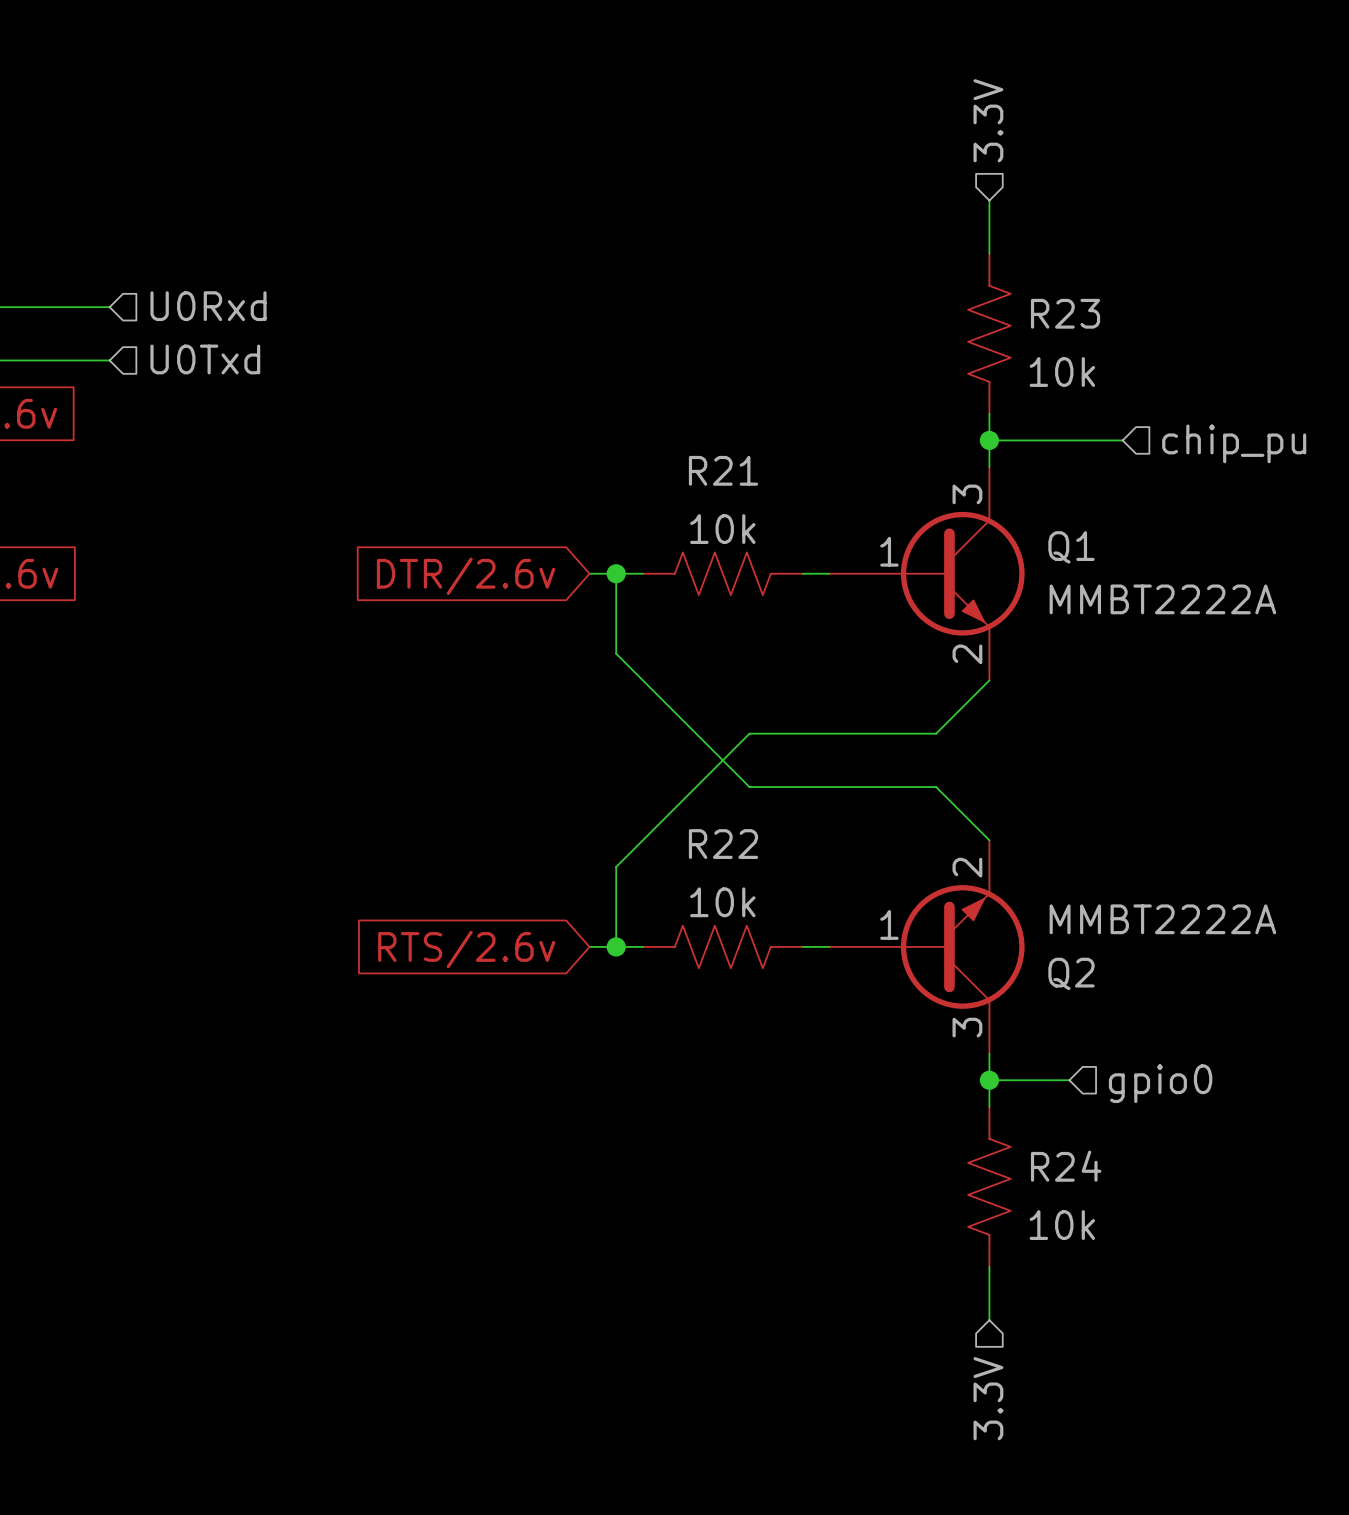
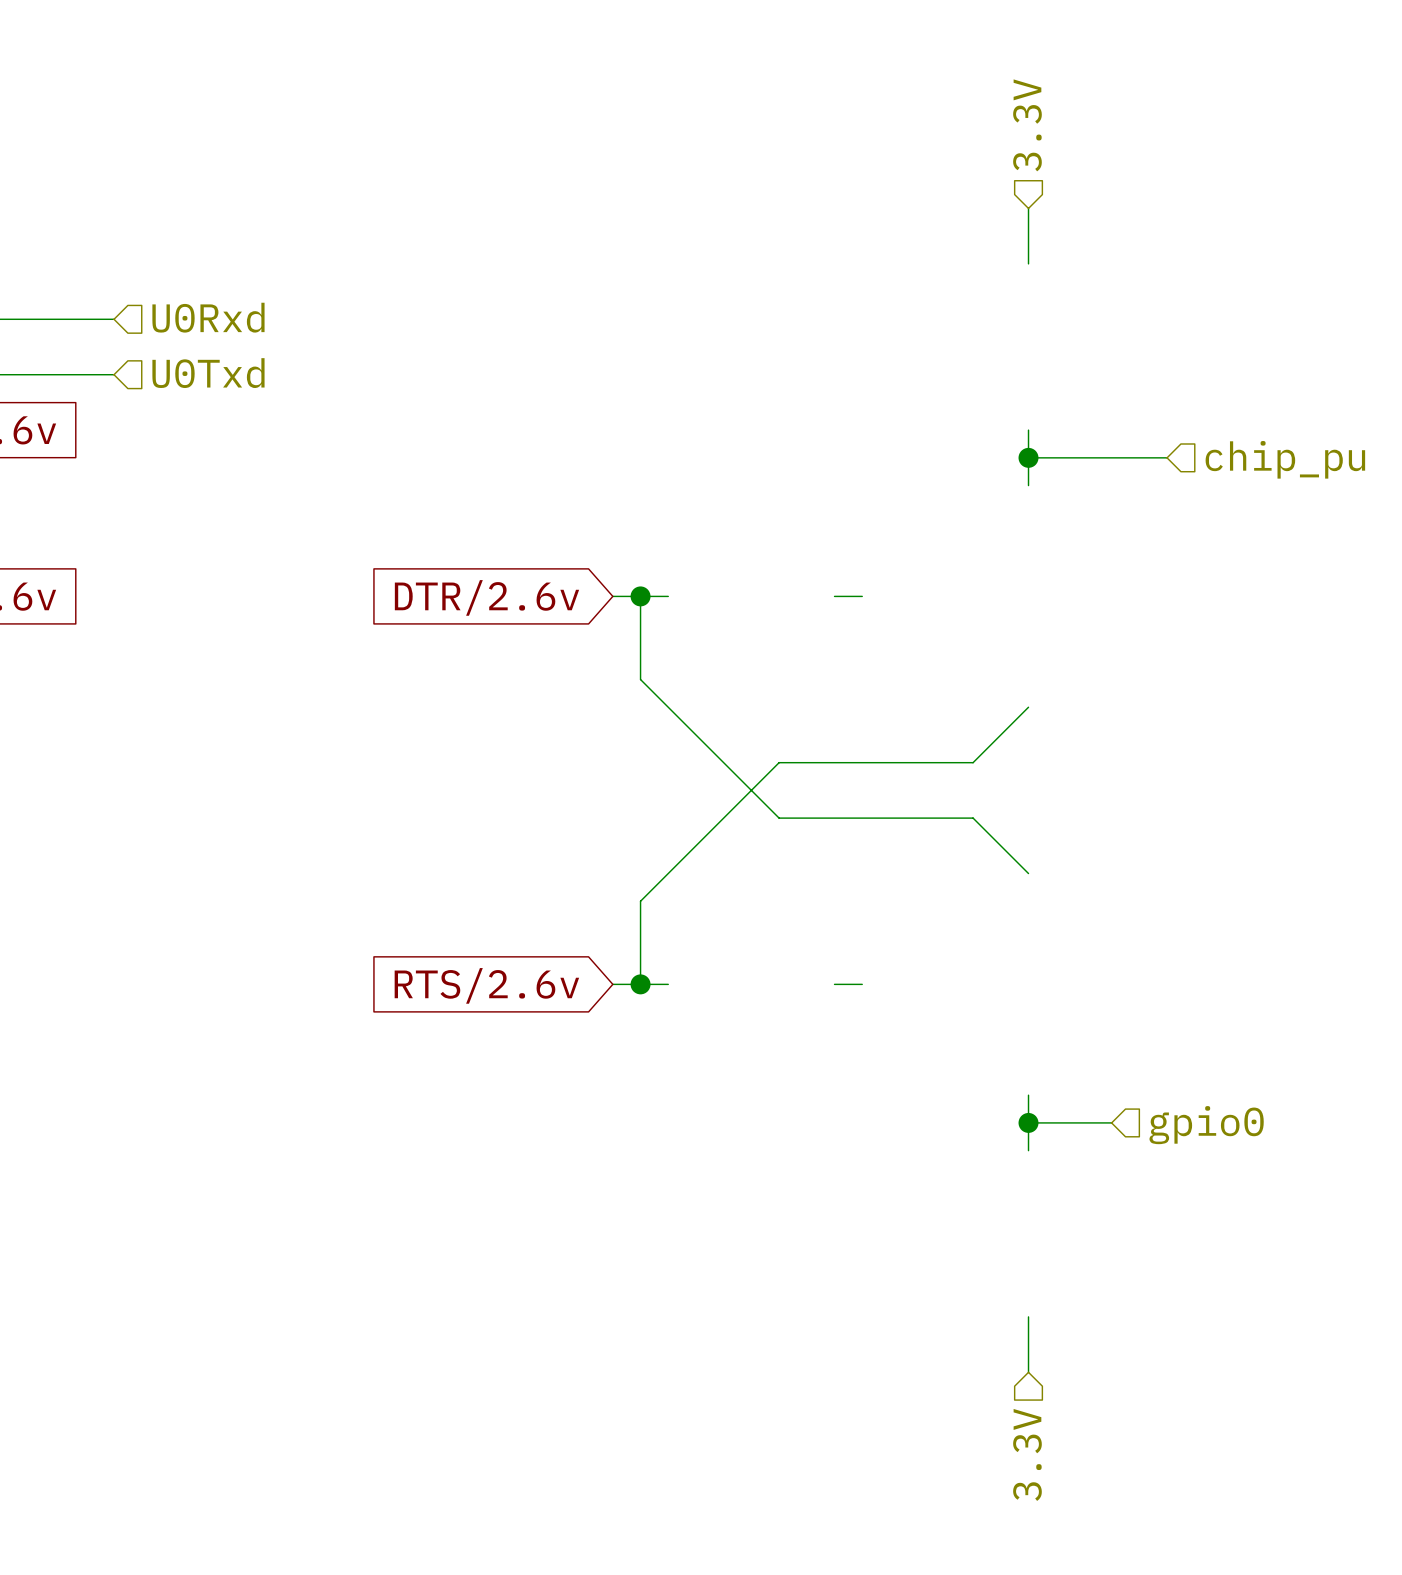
R23: 10k (989, 333) -> none
R21: 10k (722, 573) -> none
Q1: MMBT2222A (927, 573) -> none
R22: 10k (722, 946) -> none
Q2: MMBT2222A (927, 946) -> none
R24: 10k (989, 1186) -> none

